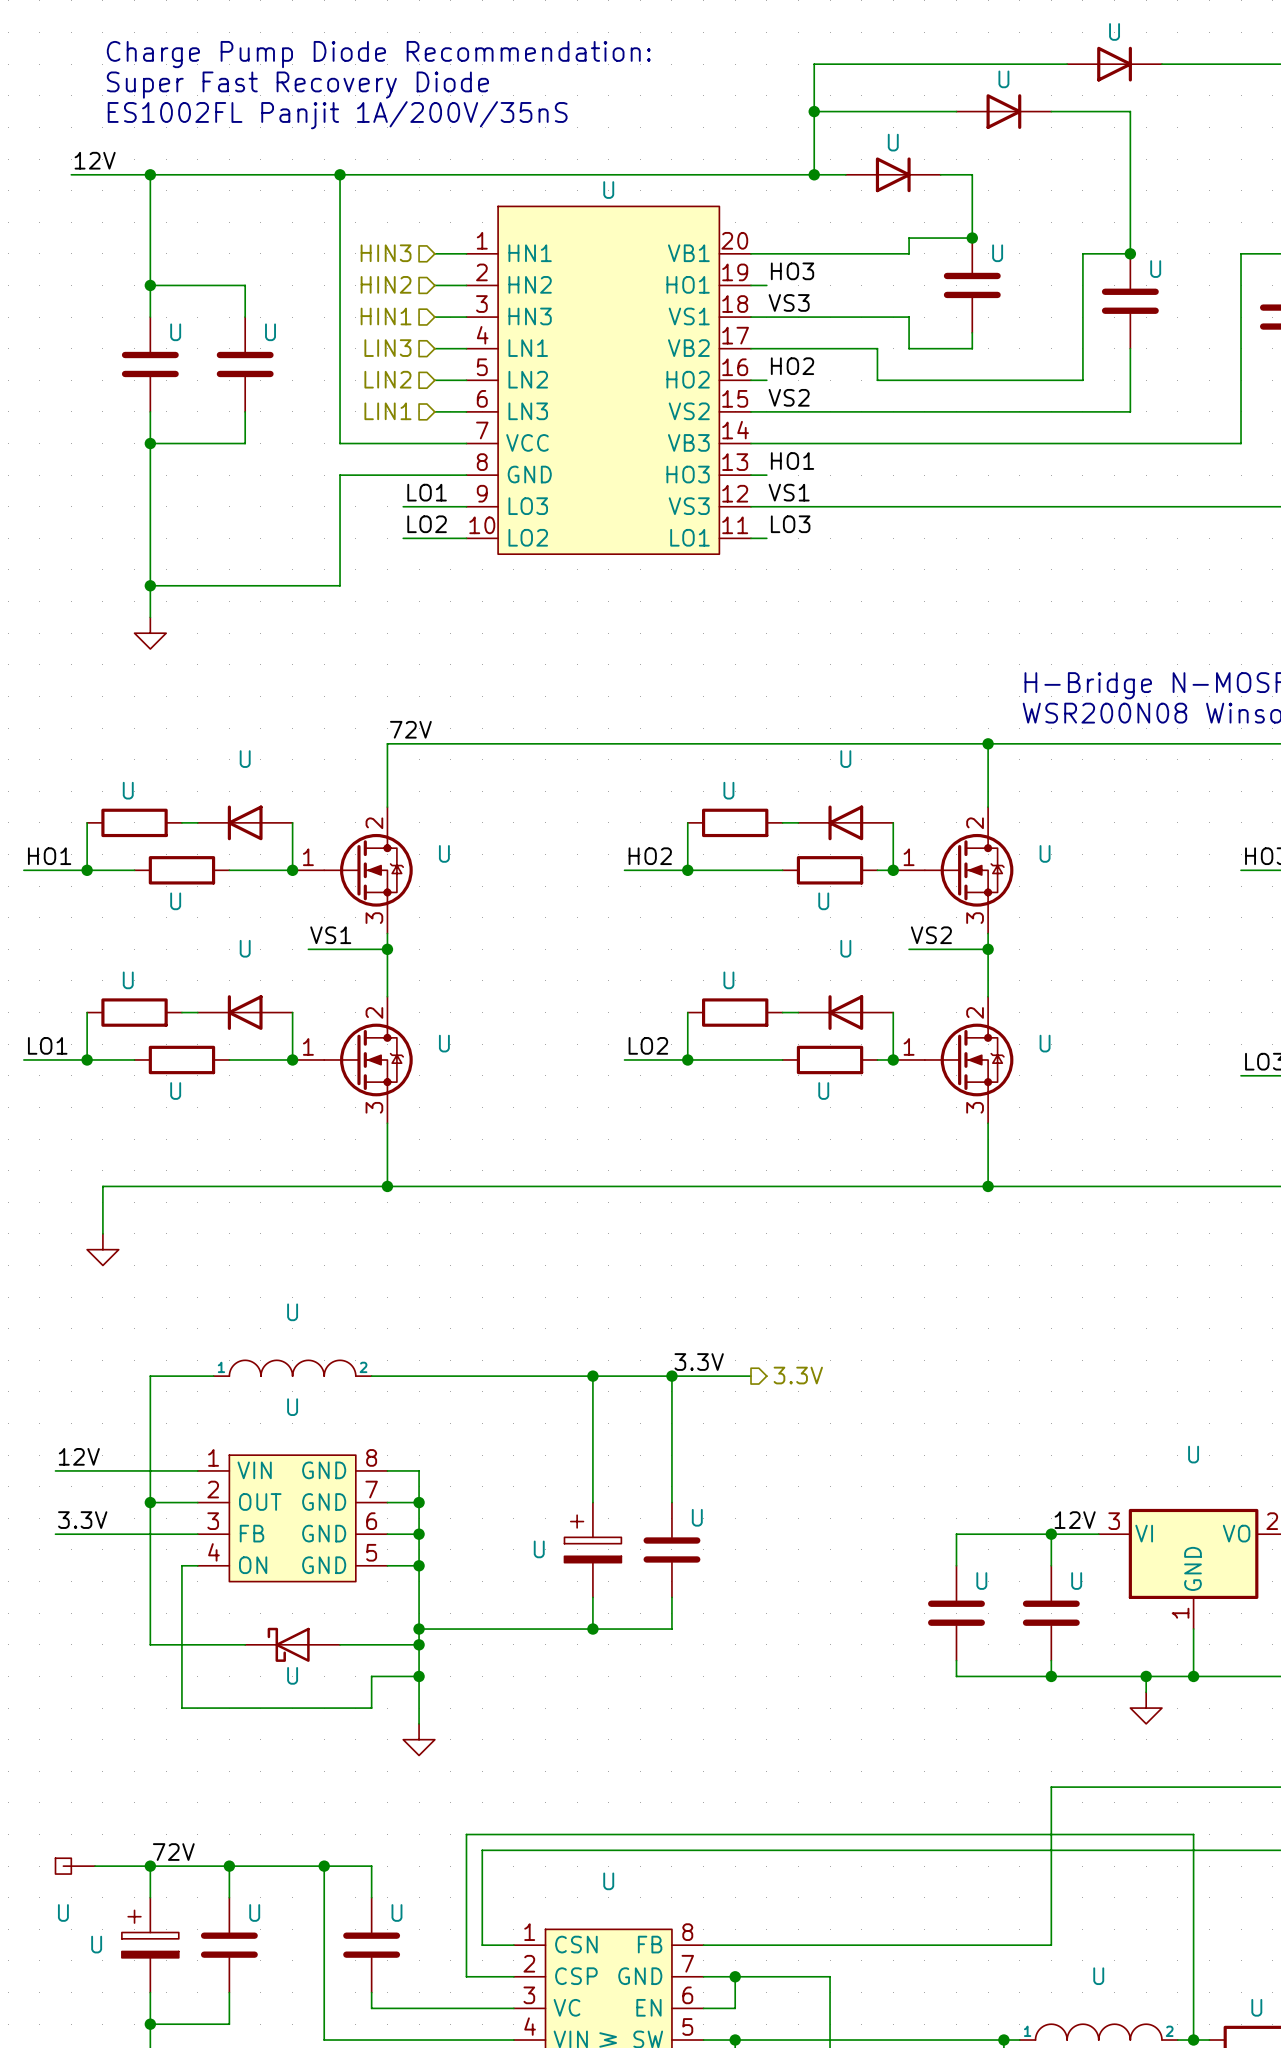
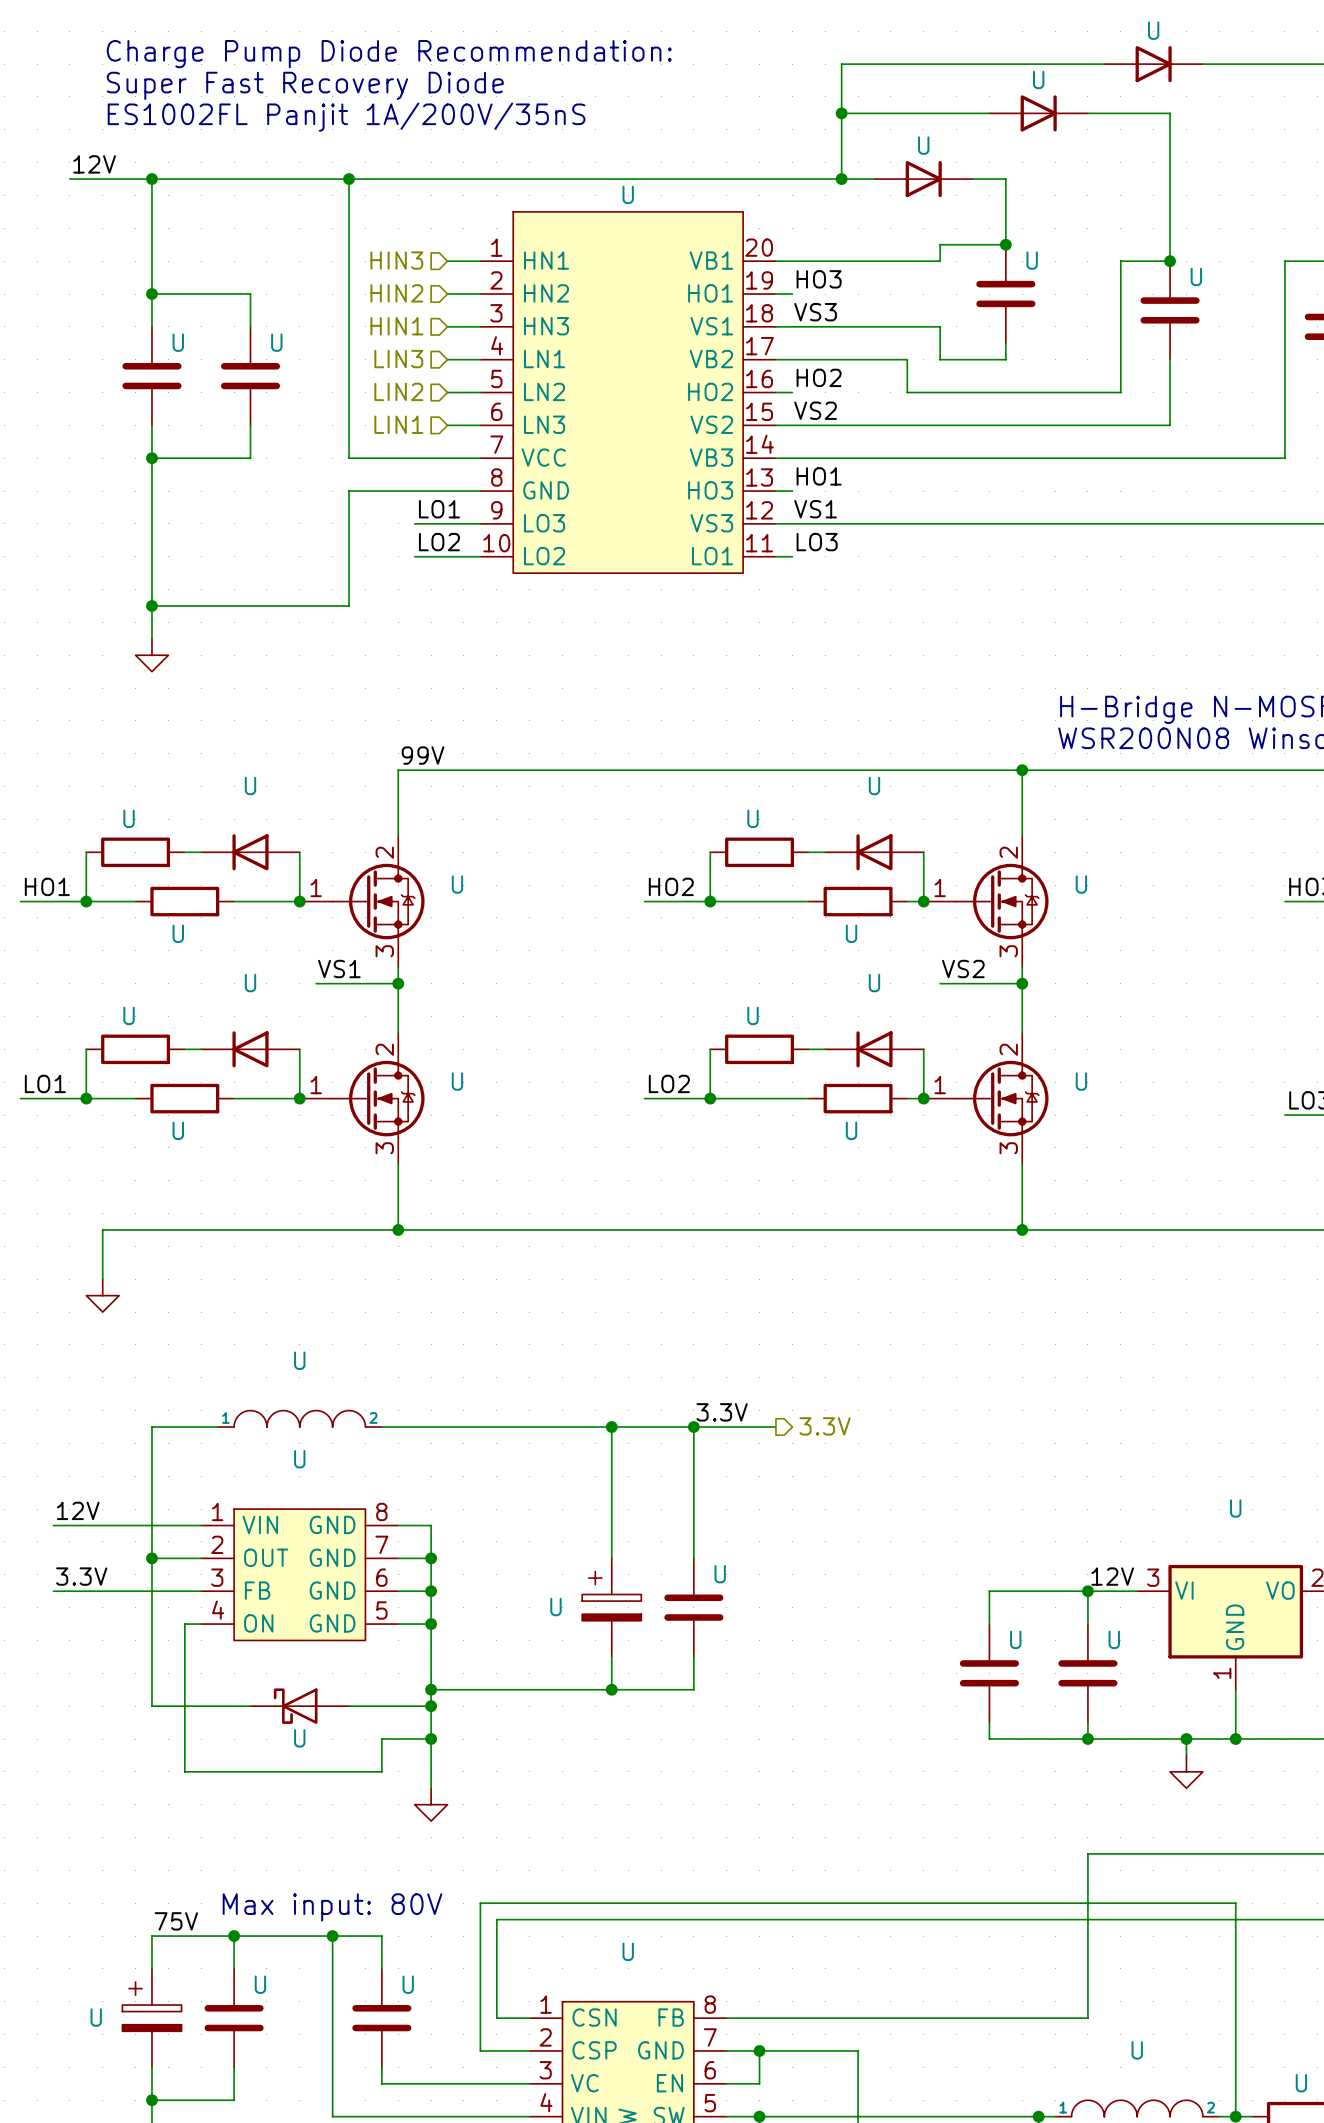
label: 72V (410, 729) -> 99V (423, 755)
text: none -> Max input: 80V (332, 1907)
label: 72V (173, 1852) -> 75V (176, 1921)
U: (75, 1866) -> none
wire: (95, 1866) (150, 1866) -> none
junction: (150, 1866) -> none

